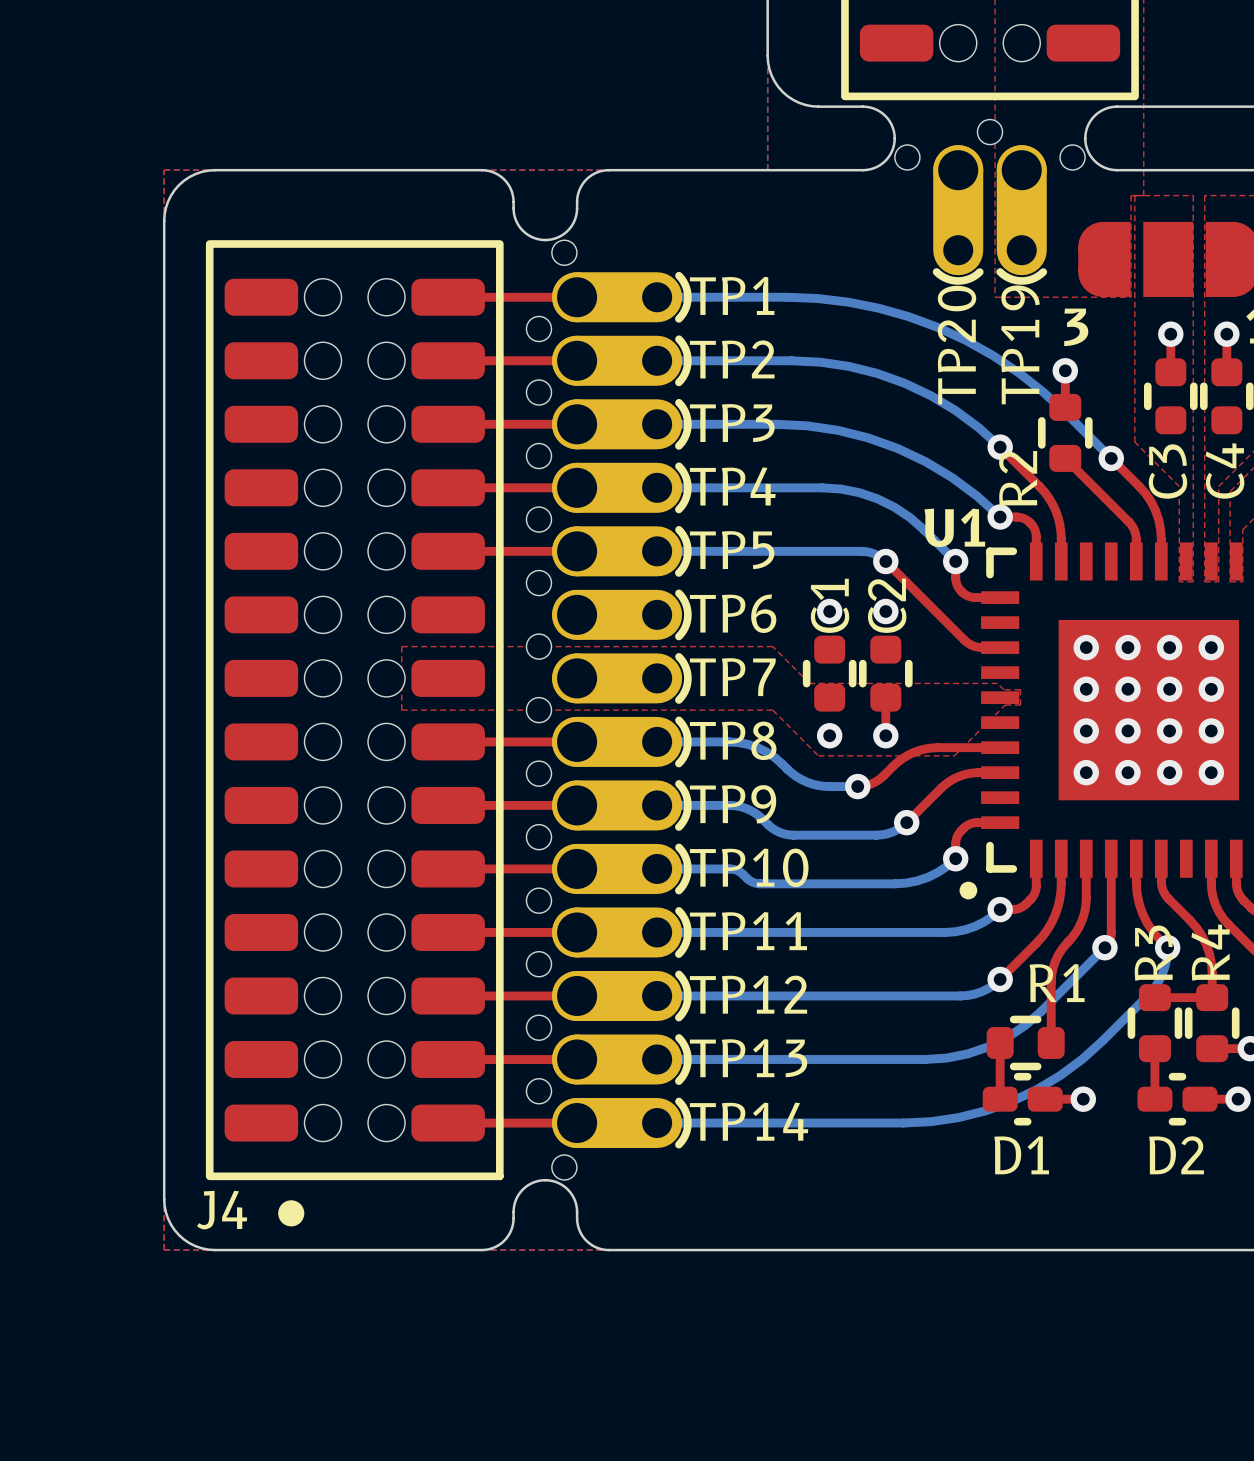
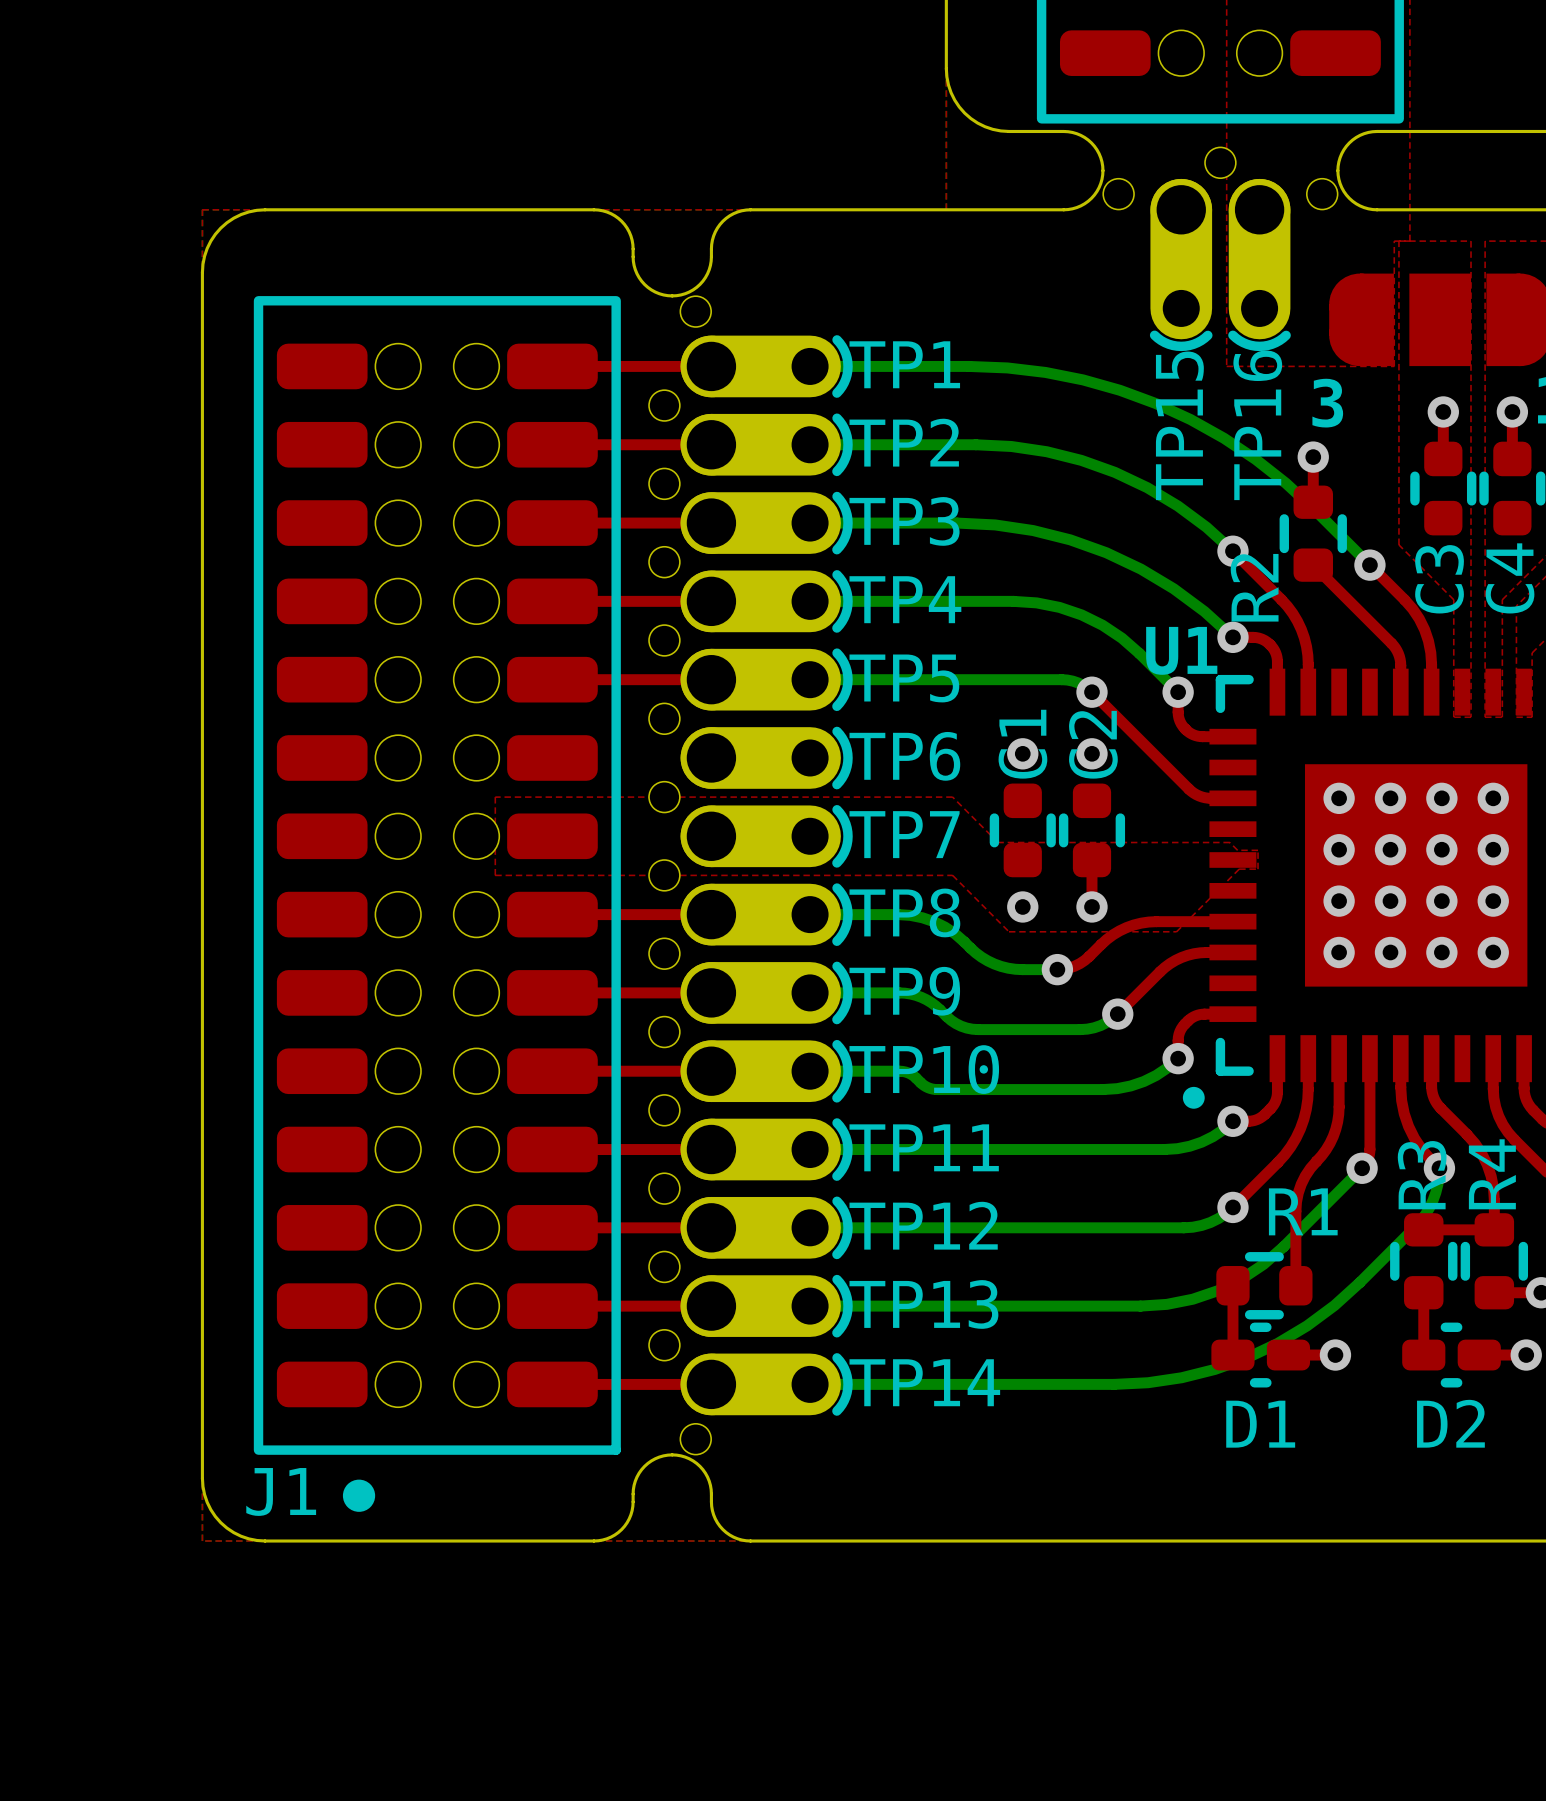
TP19 name: TP19 (1020, 344) -> TP16 (1257, 425)
TP20 name: TP20 (957, 345) -> TP15 (1179, 425)
J4 name: J4 (222, 1210) -> J1 (281, 1491)

